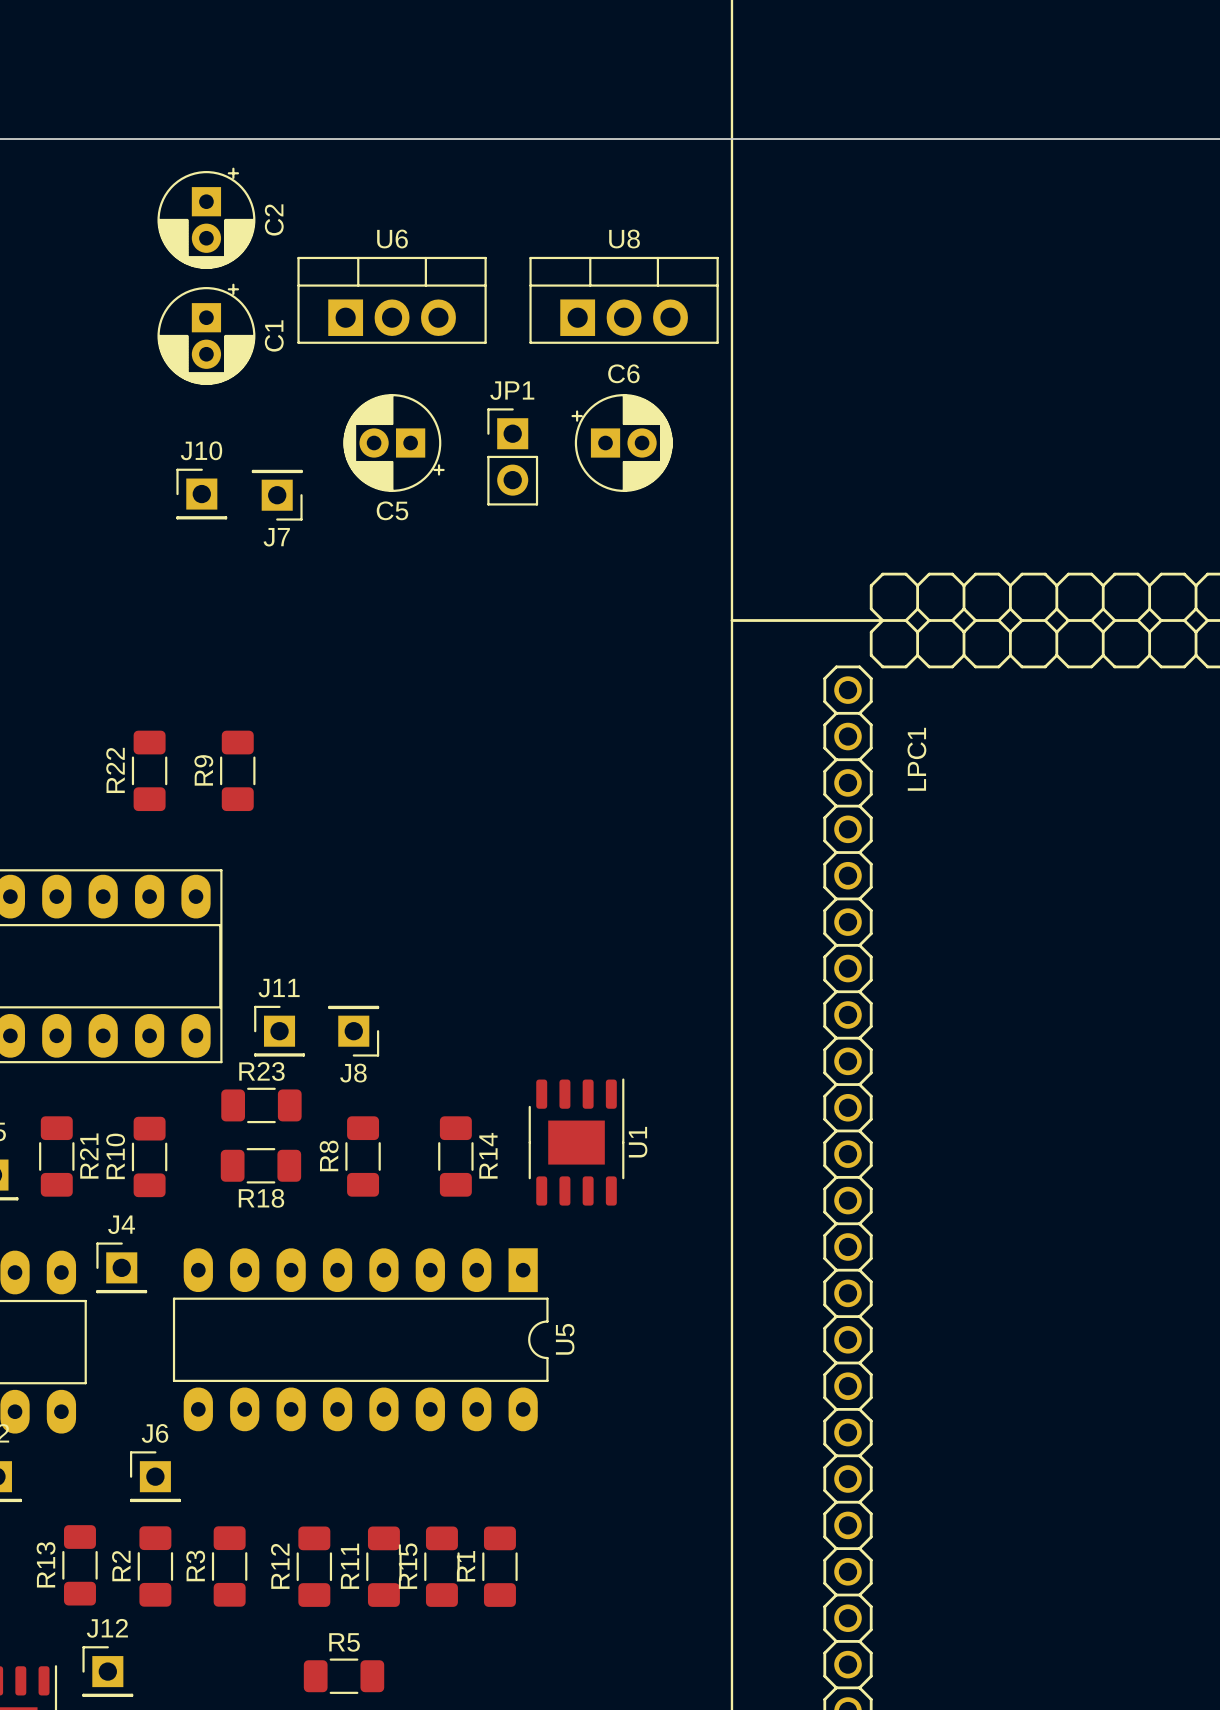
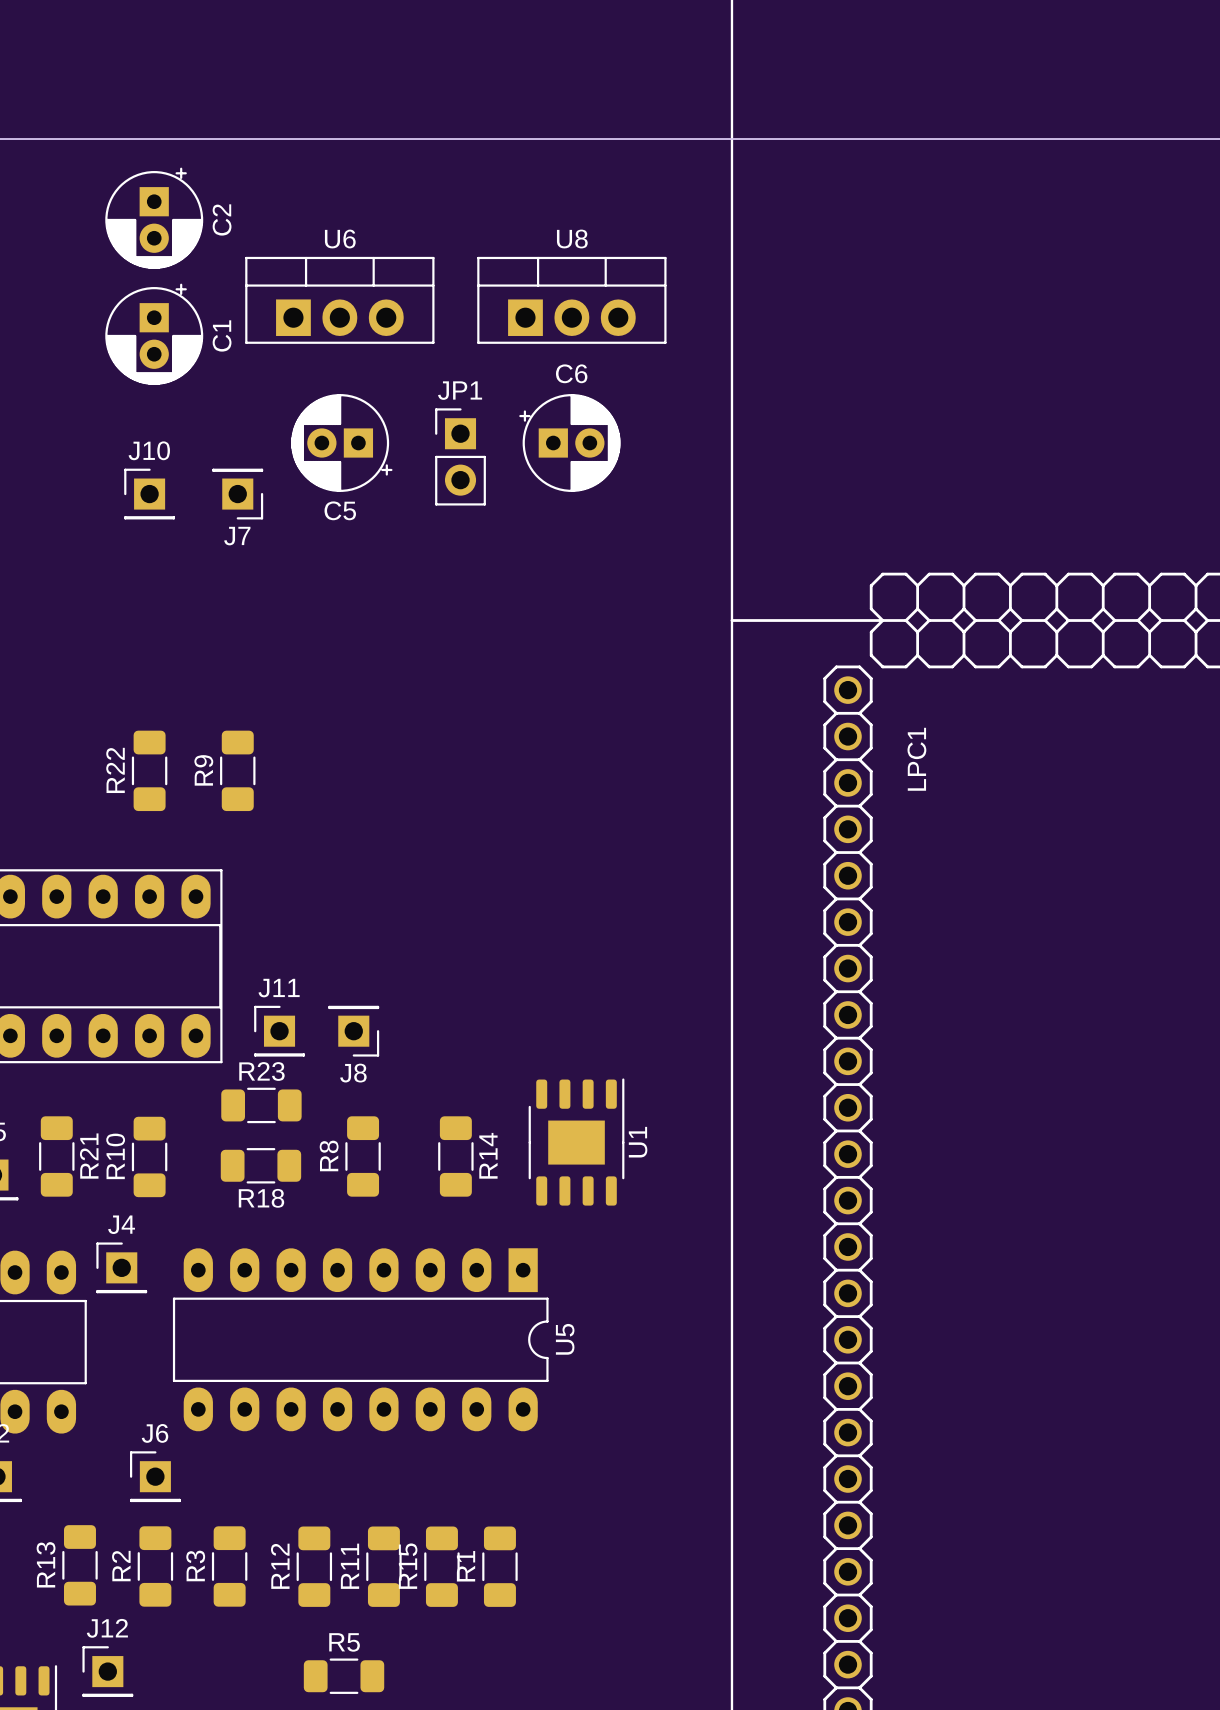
C2 position: (206, 218) -> (154, 218)
U6 position: (392, 300) -> (339, 300)
U8 position: (624, 300) -> (571, 300)
C1 position: (206, 334) -> (154, 334)
C5 position: (394, 443) -> (341, 443)
C6 position: (622, 443) -> (569, 443)
JP1 position: (512, 456) -> (460, 456)
J10 position: (201, 494) -> (149, 494)
J7 position: (277, 495) -> (237, 494)

